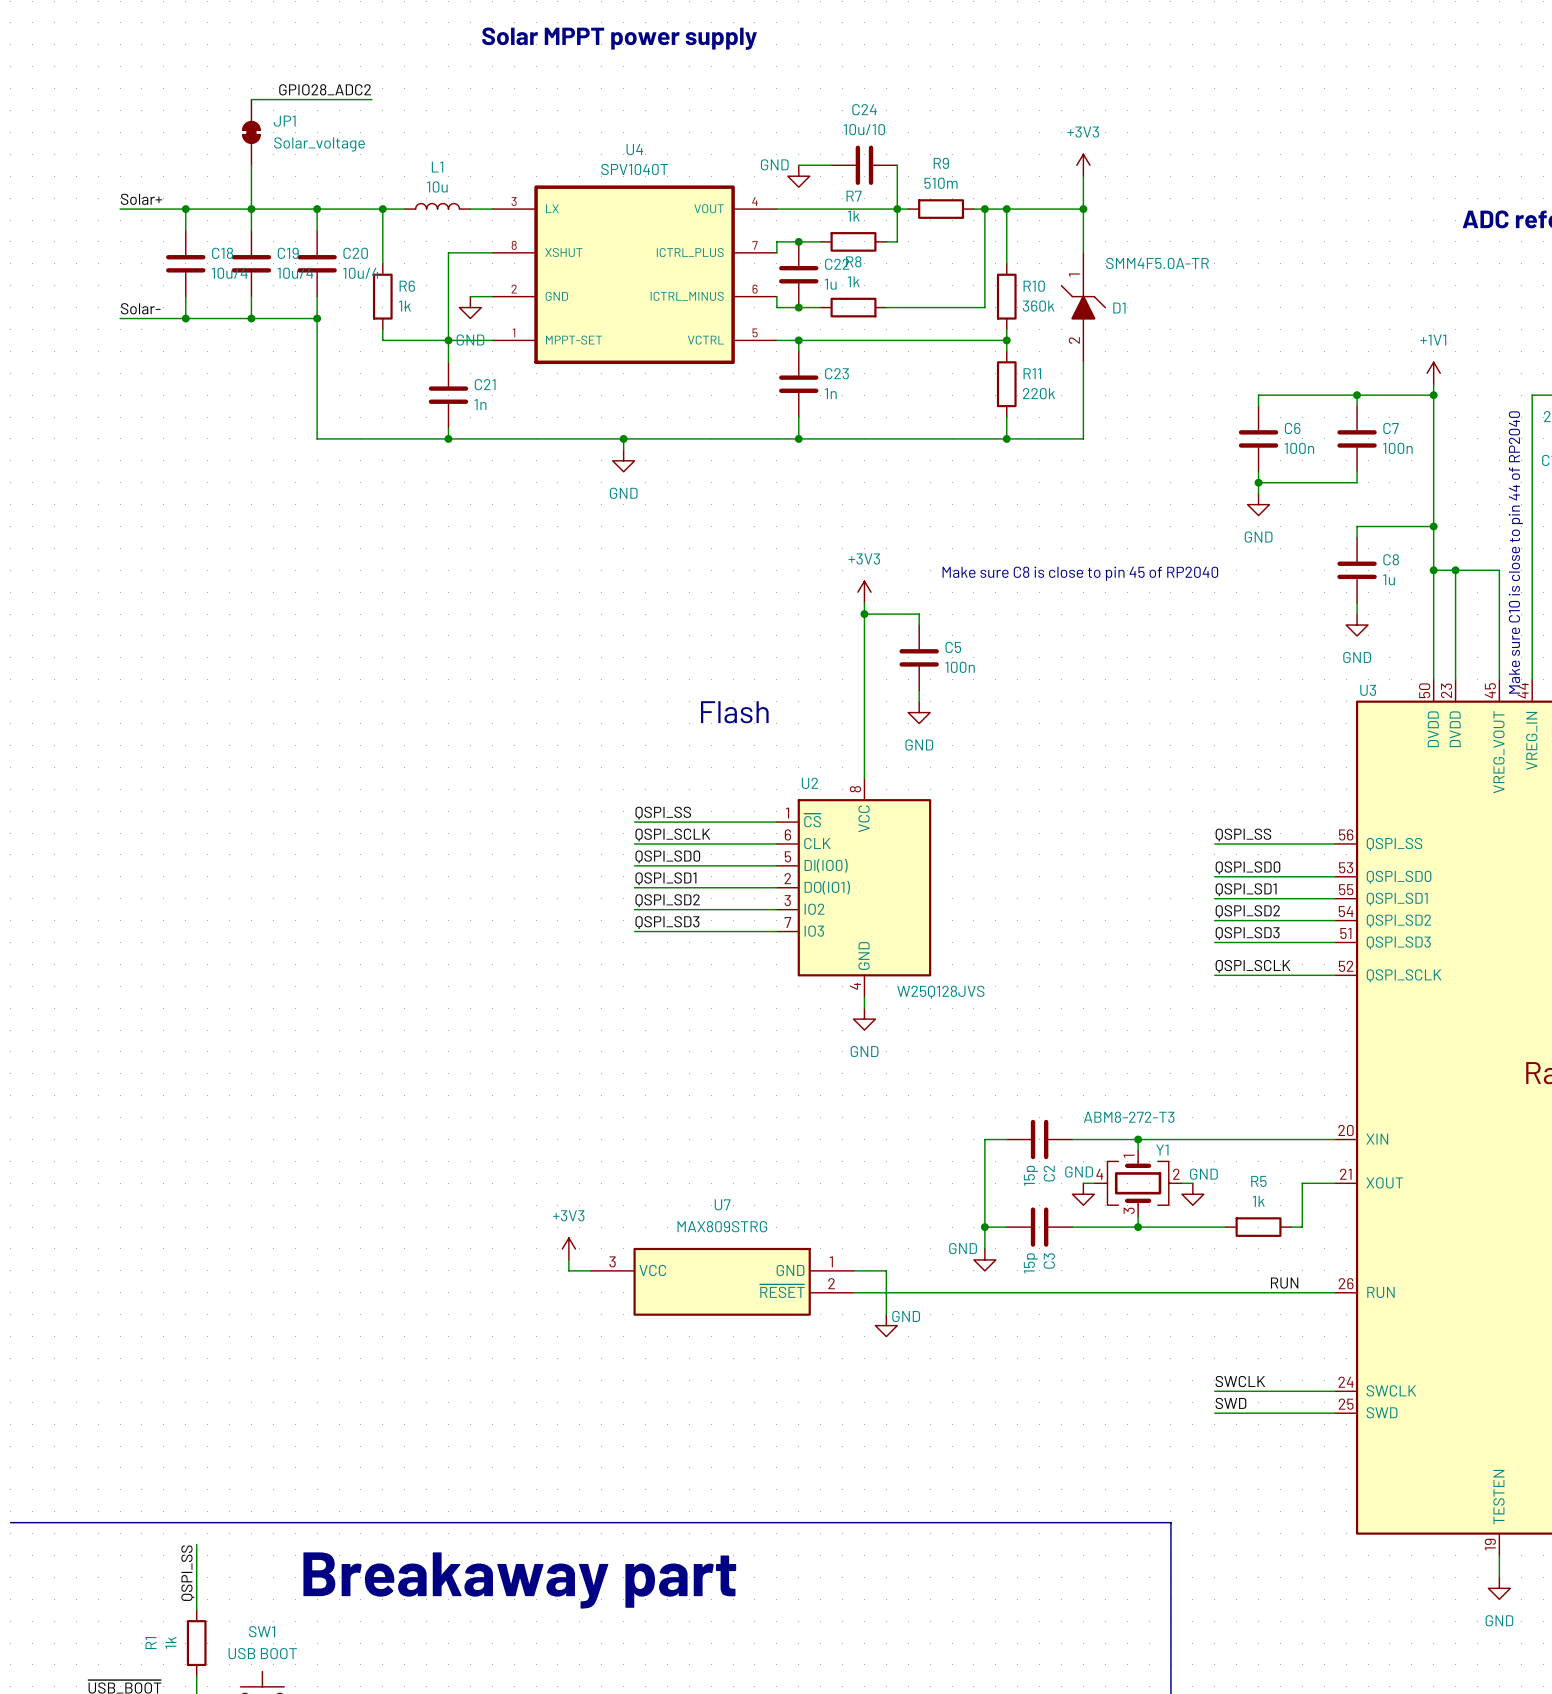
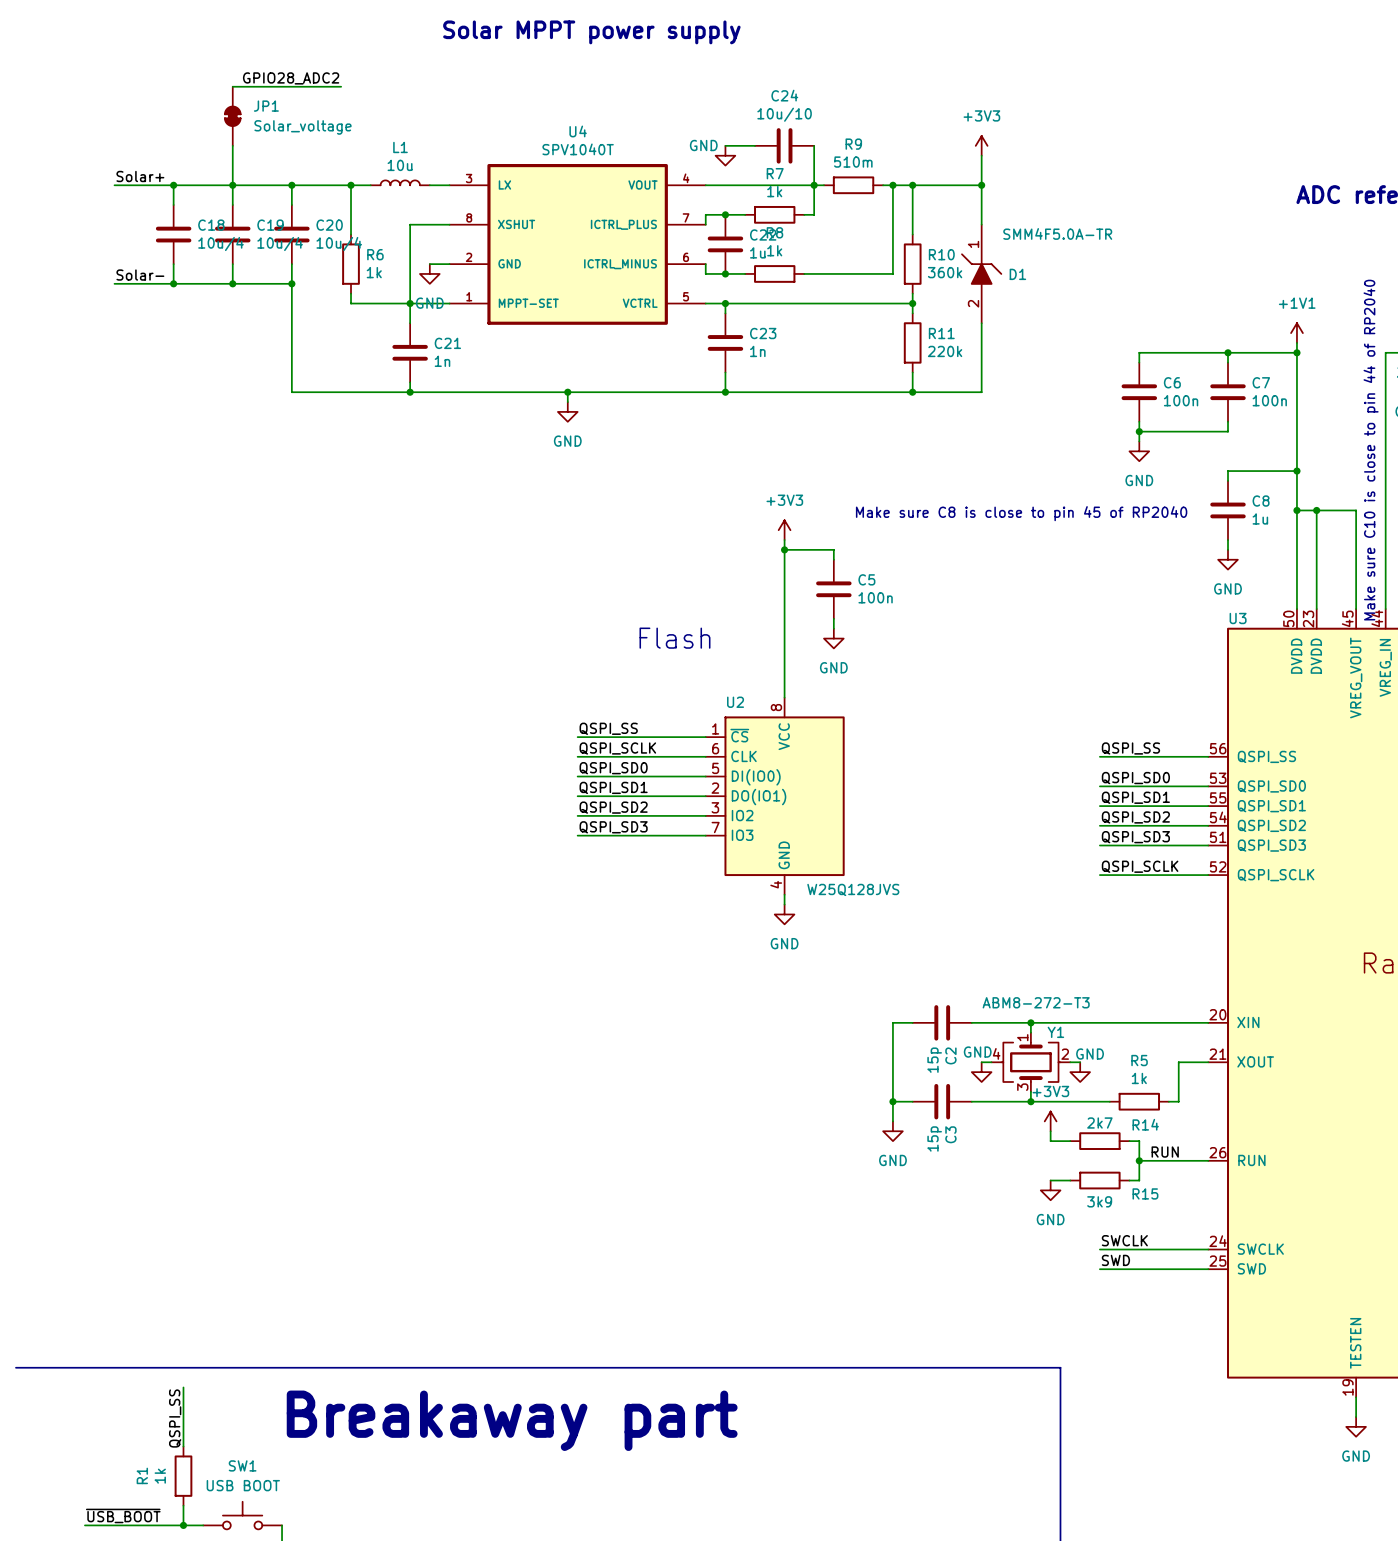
power symbol: +3V3 (568, 1248) -> none
power symbol text position: GND (963, 1248) -> GND (892, 1160)
power symbol: none -> +3V3 (1050, 1121)
wire: (568, 1259) (568, 1270) (590, 1270) -> none
wire: none -> (1050, 1131) (1050, 1141) (1070, 1141)
wire: (853, 1270) (886, 1270) (886, 1314) -> none
R14: none -> 2k7 (1099, 1141)
wire: none -> (1129, 1141) (1139, 1141) (1139, 1180) (1129, 1180)
U7: MAX809STRG (722, 1281) -> none
wire: (853, 1292) (1258, 1292) -> none
junction: none -> (1139, 1160)
wire: none -> (1050, 1180) (1070, 1180)
R15: none -> 3k9 (1099, 1180)
power symbol: GND (886, 1325) -> none
power symbol: none -> GND (1050, 1190)

